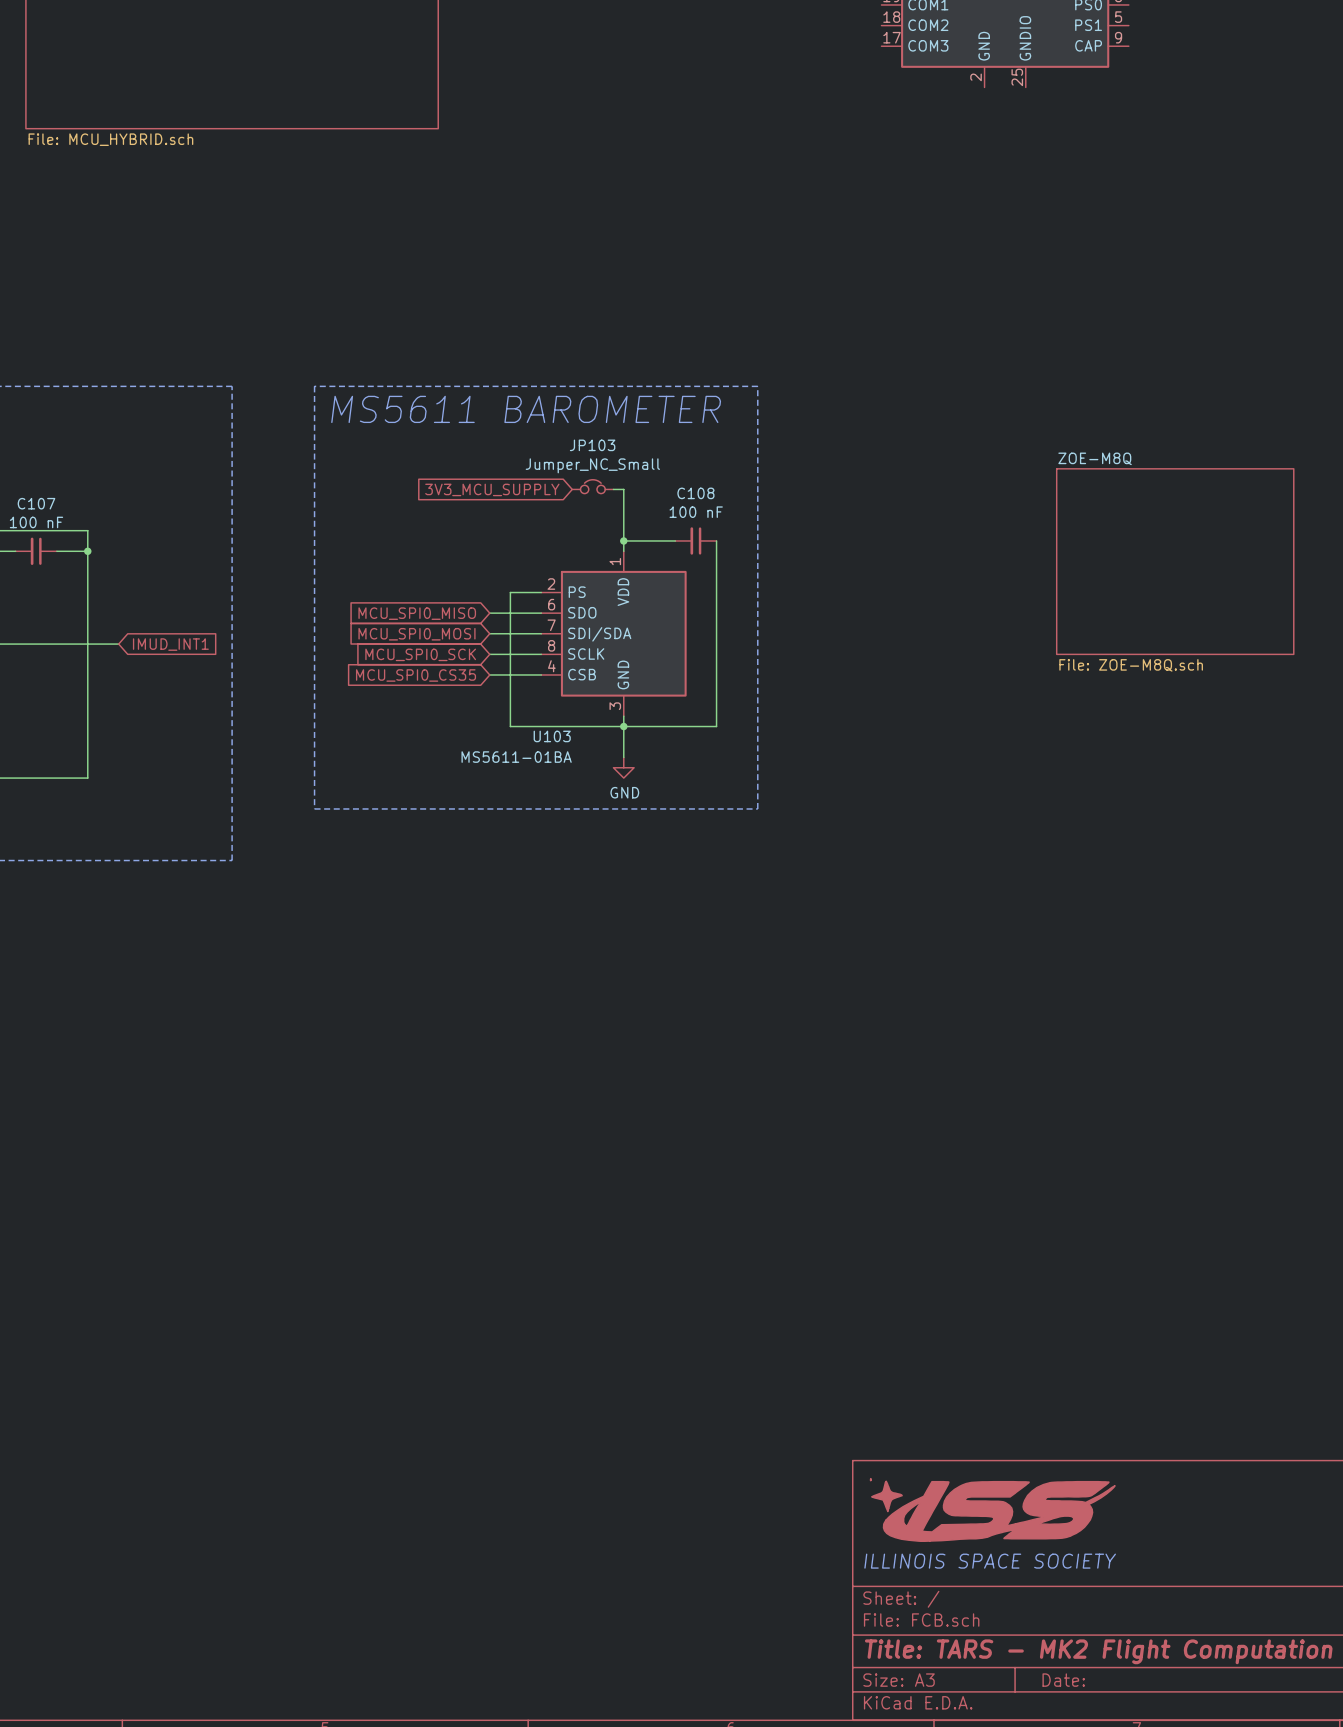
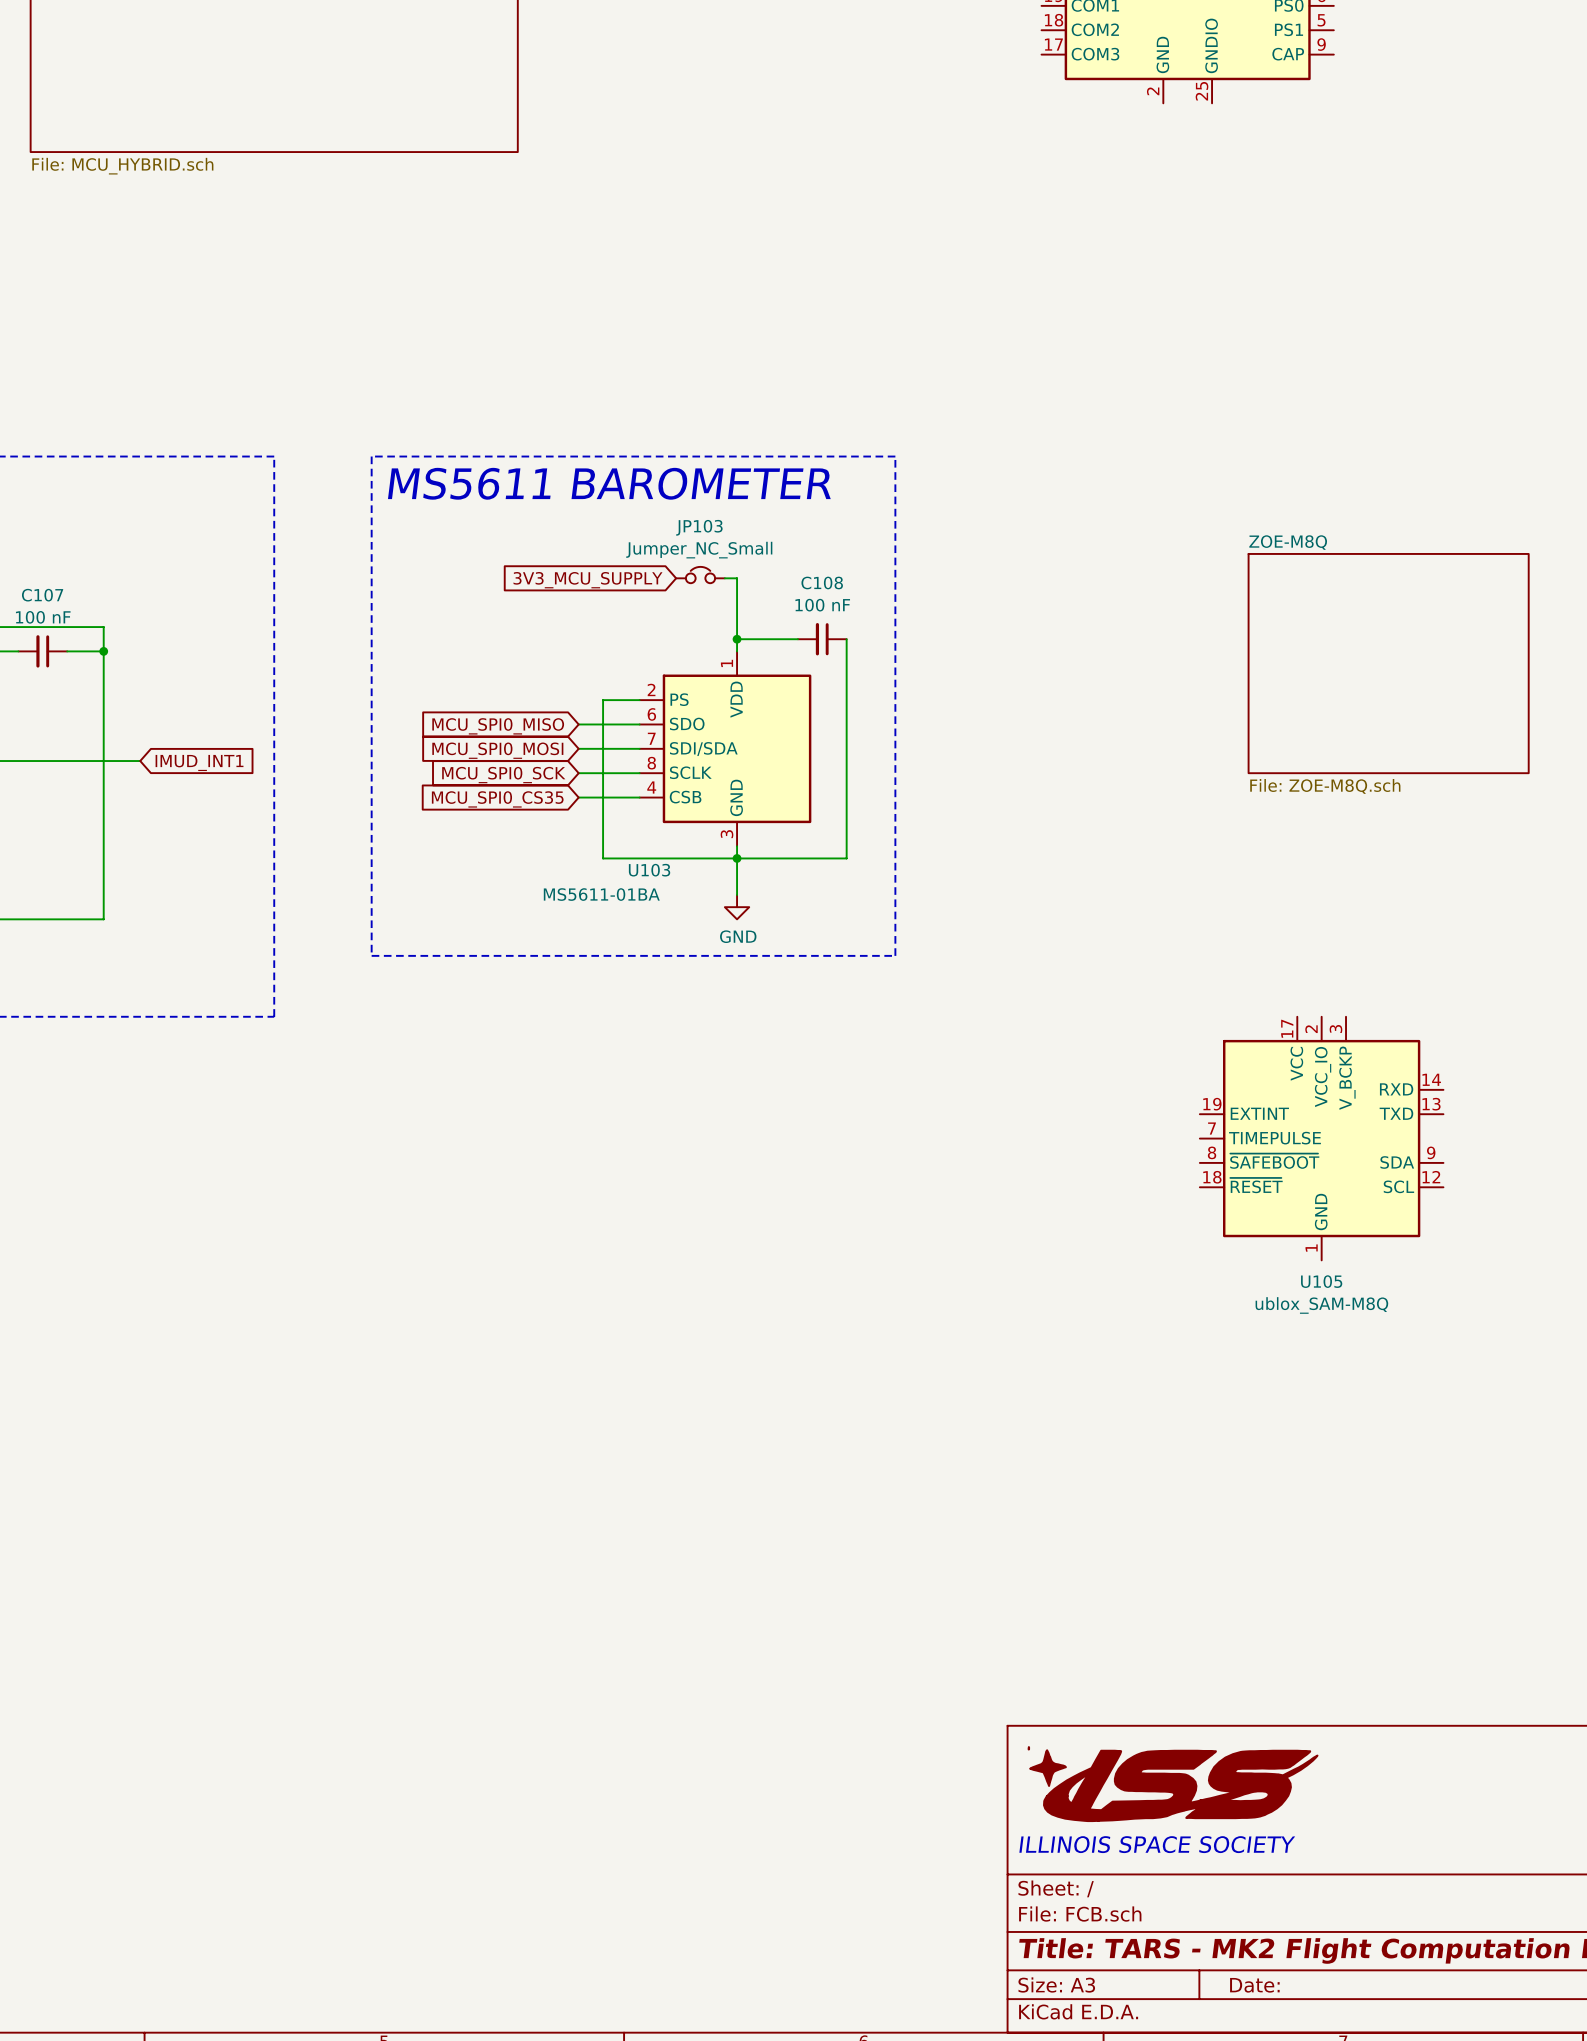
U105: none -> ublox_SAM-M8Q (1321, 1138)

